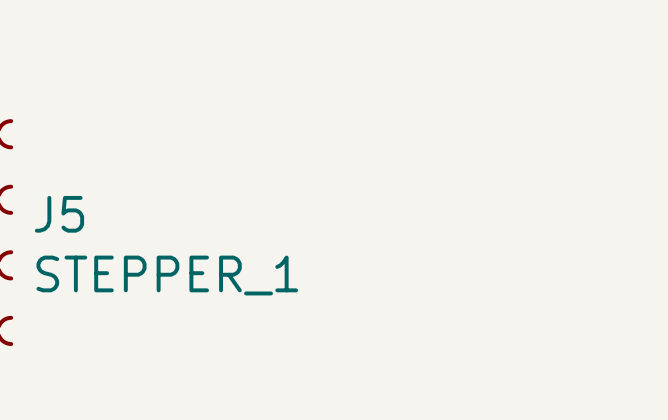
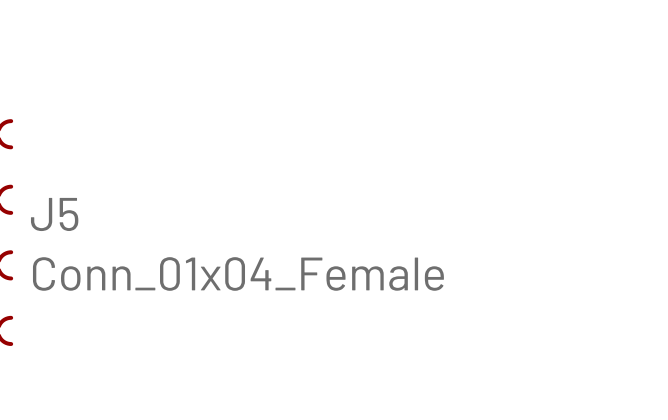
J5 value: STEPPER_1 (167, 275) -> Conn_01x04_Female (238, 273)

